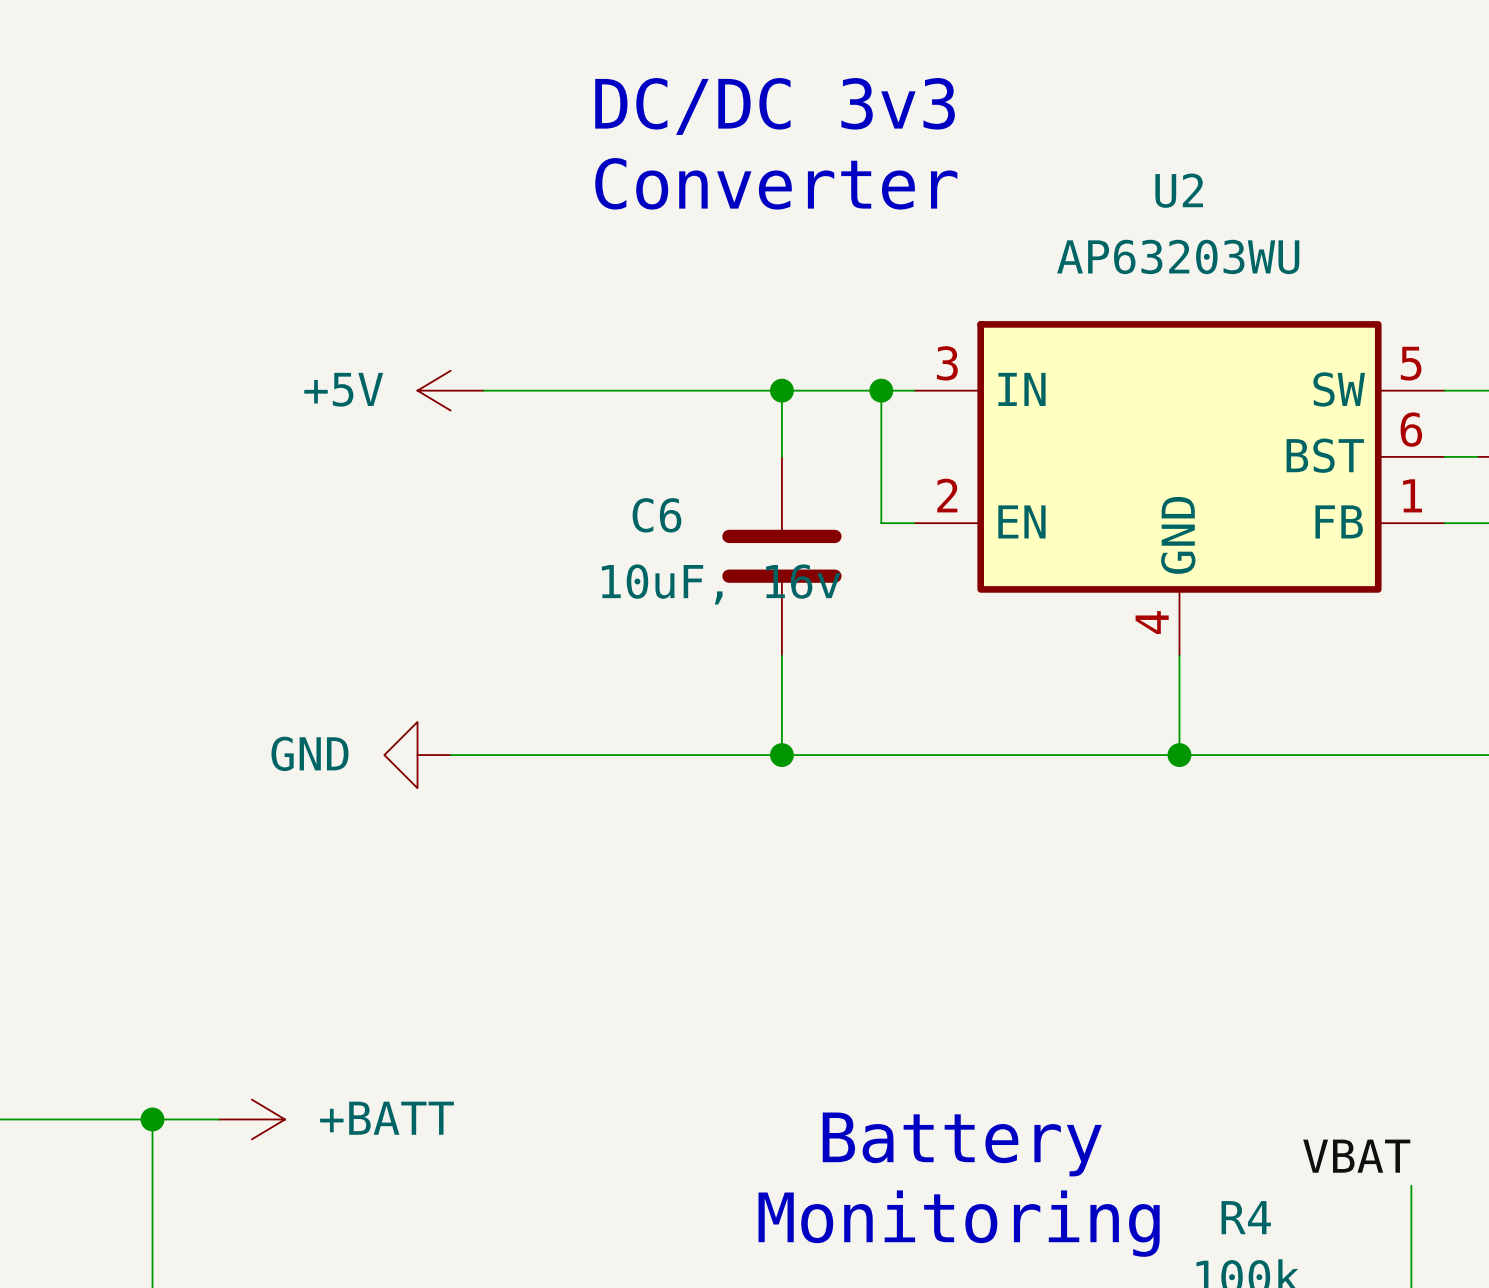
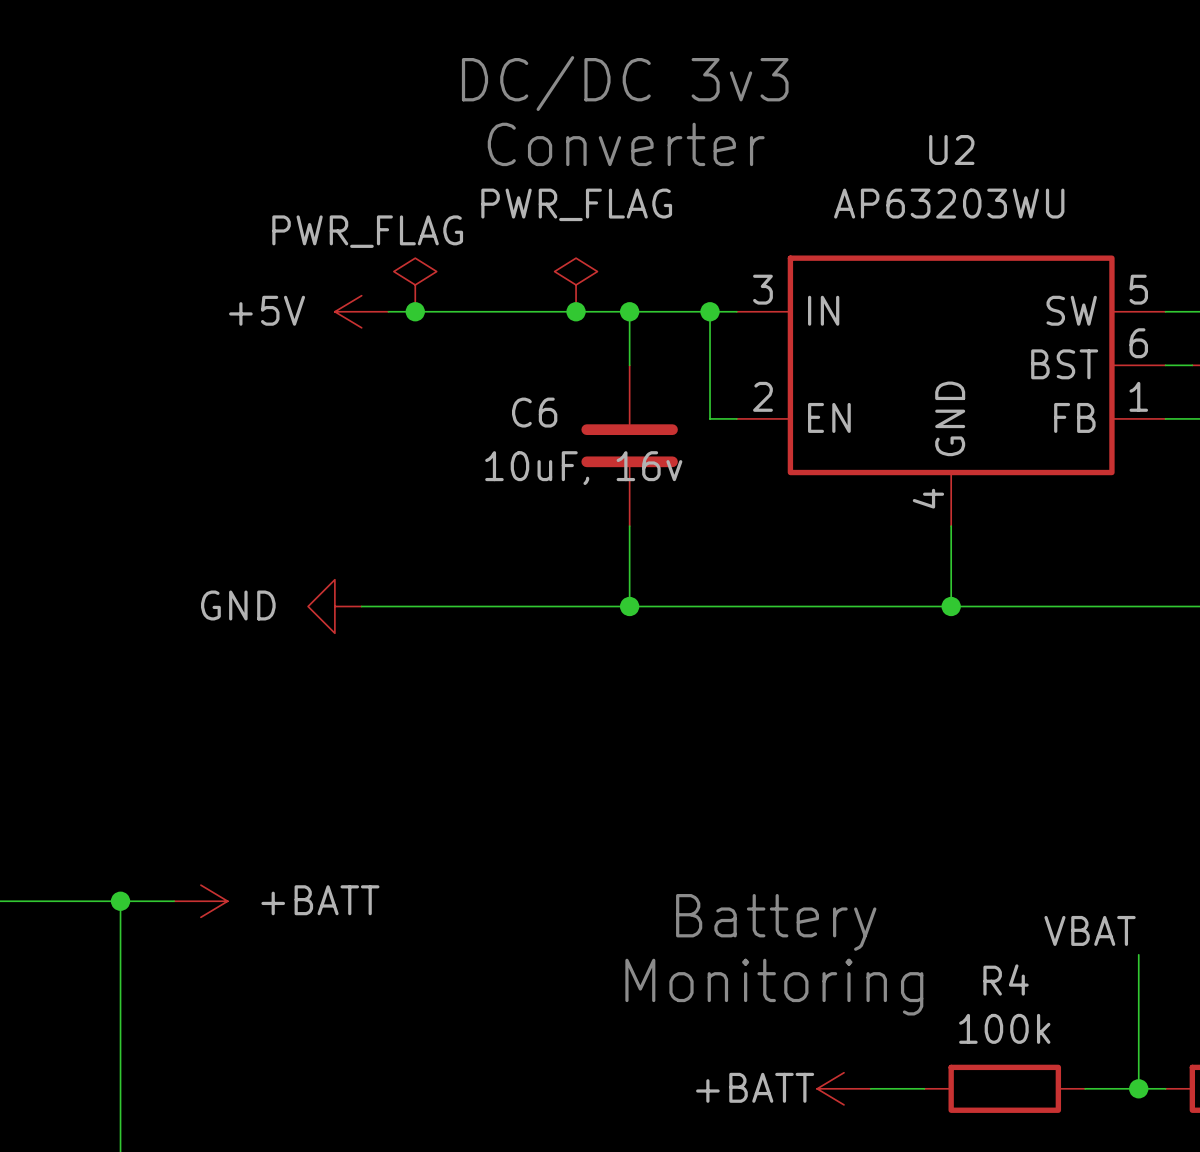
power symbol: none -> PWR_FLAG (415, 284)
power symbol: none -> PWR_FLAG (576, 284)
junction: none -> (415, 311)
junction: none -> (576, 311)

